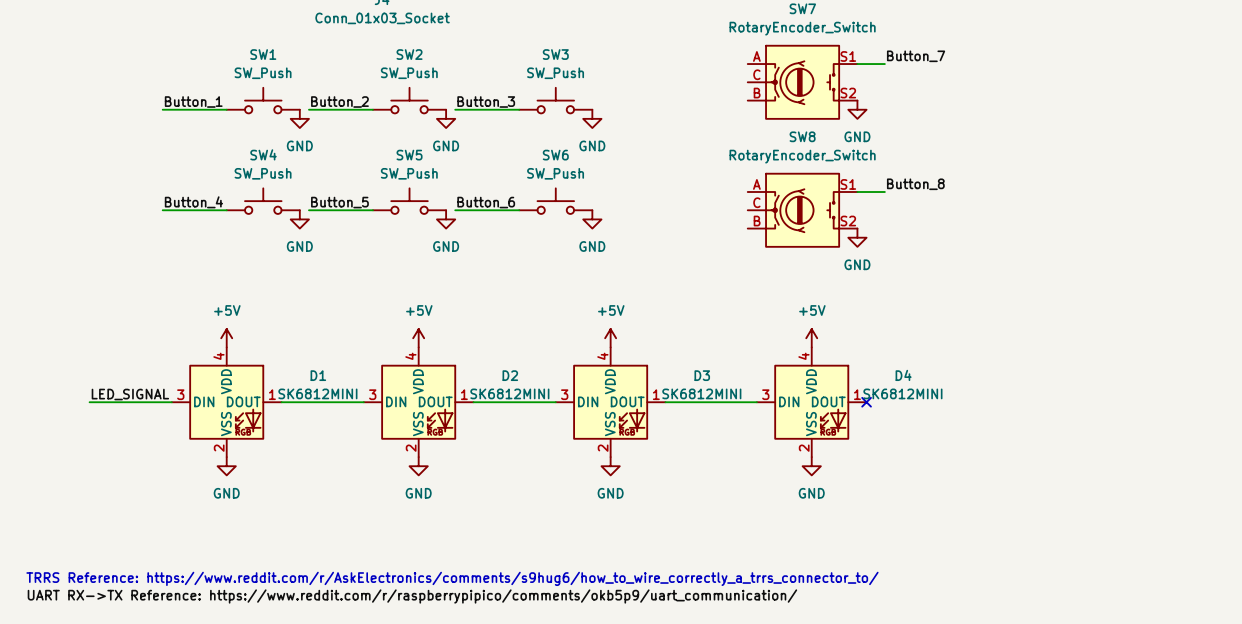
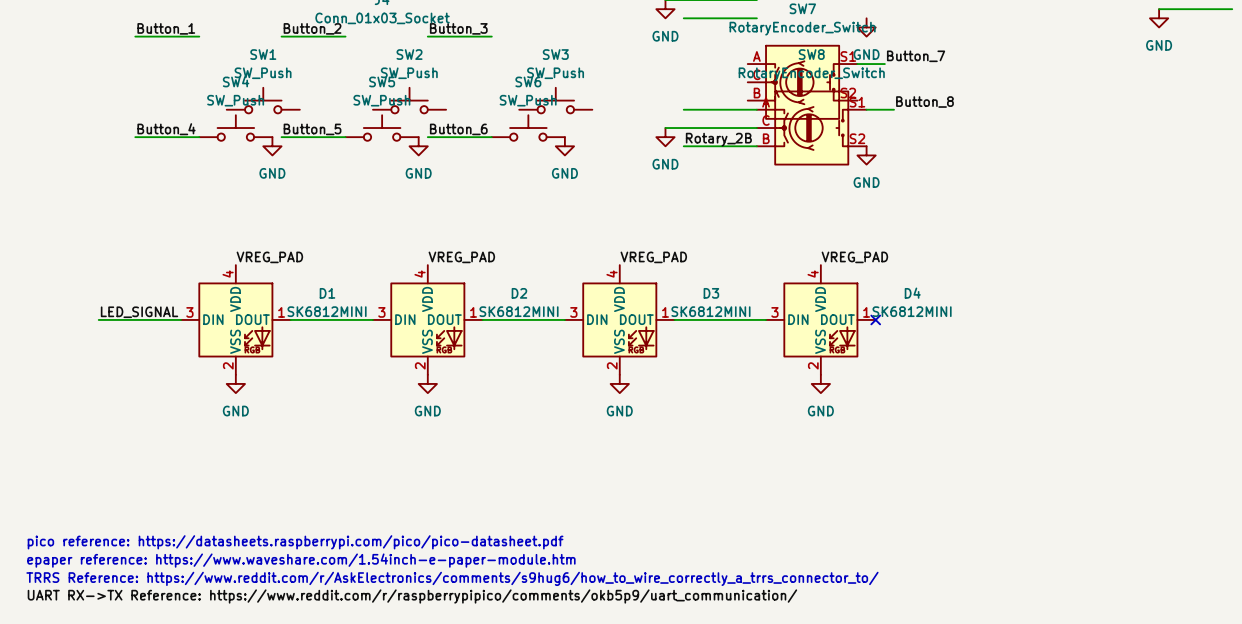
wire: none -> (665, 0) (756, 0)
power symbol: none -> GND (665, 9)
wire: none -> (1159, 9) (1232, 9)
wire: none -> (683, 18) (756, 18)
power symbol: none -> GND (1159, 18)
power symbol: none -> GND (866, 27)
label position: Button_1 (193, 102) -> Button_1 (166, 28)
label position: Button_2 (339, 102) -> Button_2 (312, 28)
label position: Button_3 (486, 102) -> Button_3 (458, 28)
wire: (162, 109) (226, 109) -> (135, 36) (199, 36)
wire: (308, 109) (372, 109) -> (281, 36) (345, 36)
wire: (455, 109) (519, 109) -> (427, 36) (491, 36)
wire: none -> (683, 109) (756, 109)
power symbol: GND (857, 109) -> none
power symbol position: GND (299, 118) -> GND (272, 146)
power symbol position: GND (446, 118) -> GND (418, 146)
power symbol: GND (592, 118) -> none
wire: none -> (665, 128) (756, 128)
power symbol: none -> GND (665, 137)
label: none -> Rotary_2B (718, 139)
power symbol: none -> GND (564, 146)
wire: none -> (683, 146) (756, 146)
power symbol: none -> GND (866, 155)
label position: Button_8 (915, 184) -> Button_8 (924, 102)
wire: (857, 192) (884, 192) -> (866, 109) (894, 109)
SW4 position: (263, 201) -> (235, 128)
SW5 position: (409, 201) -> (382, 128)
SW6 position: (555, 201) -> (528, 128)
label position: Button_4 (193, 202) -> Button_4 (166, 129)
label position: Button_5 (339, 202) -> Button_5 (312, 129)
label position: Button_6 (486, 202) -> Button_6 (458, 129)
wire: (162, 210) (226, 210) -> (135, 137) (199, 137)
wire: (308, 210) (372, 210) -> (281, 137) (345, 137)
wire: (455, 210) (519, 210) -> (427, 137) (491, 137)
SW8 position: (802, 210) -> (811, 128)
power symbol: GND (299, 219) -> none
power symbol: GND (446, 219) -> none
power symbol: GND (592, 219) -> none
power symbol: GND (857, 237) -> none
label: none -> VREG_PAD (269, 257)
label: none -> VREG_PAD (461, 257)
label: none -> VREG_PAD (653, 257)
label: none -> VREG_PAD (854, 257)
no-connect mark: none -> (875, 319)
power symbol: +5V (226, 338) -> none
power symbol: +5V (418, 338) -> none
power symbol: +5V (610, 338) -> none
power symbol: +5V (811, 338) -> none
power symbol: none -> GND (427, 383)
power symbol: none -> GND (820, 383)
label position: LED_SIGNAL (130, 394) -> LED_SIGNAL (139, 312)
wire: (89, 402) (171, 402) -> (98, 319) (181, 319)
D1 position: (226, 402) -> (235, 319)
wire: (281, 402) (363, 402) -> (290, 319) (372, 319)
D2 position: (418, 402) -> (427, 319)
wire: (473, 402) (555, 402) -> (482, 319) (564, 319)
D3 position: (610, 402) -> (619, 319)
wire: (665, 402) (756, 402) -> (674, 319) (766, 319)
D4 position: (811, 402) -> (820, 319)
no-connect mark: (866, 402) -> none
power symbol position: GND (226, 466) -> GND (235, 383)
power symbol: GND (418, 466) -> none
power symbol position: GND (610, 466) -> GND (619, 383)
power symbol: GND (811, 466) -> none
text: none -> pico reference: https://datasheets.raspberrypi.com/pico/pico-datasheet.pdf (295, 542)
text: none -> epaper reference: https://www.waveshare.com/1.54inch-e-paper-module.htm (301, 560)

